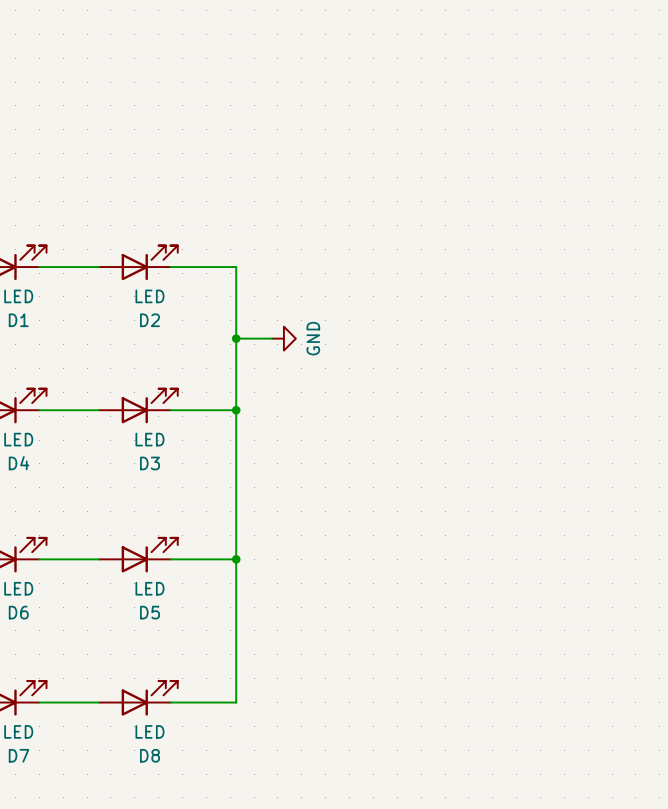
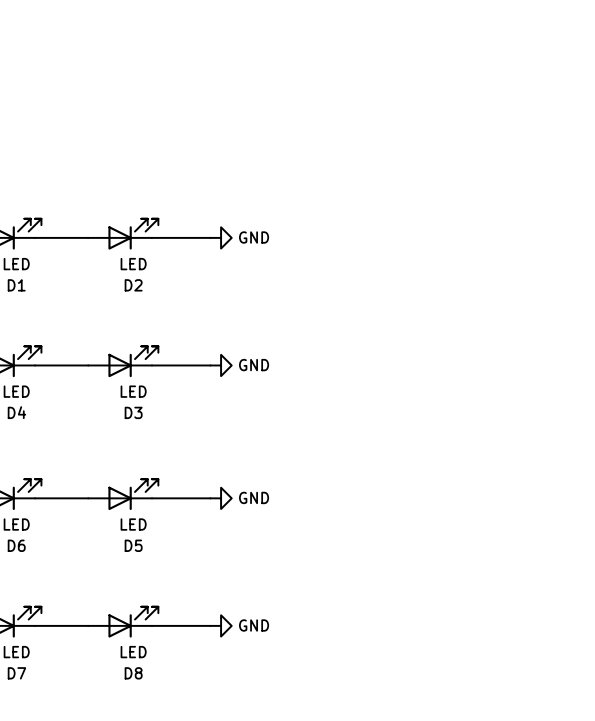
wire: (236, 267) (236, 702) -> none
power symbol: none -> GND (221, 237)
wire: (236, 338) (272, 338) -> none
junction: (236, 338) -> none
power symbol: GND (283, 338) -> none
junction: (236, 410) -> none
power symbol: none -> GND (221, 365)
junction: (236, 559) -> none
power symbol: none -> GND (221, 498)
power symbol: none -> GND (221, 625)

